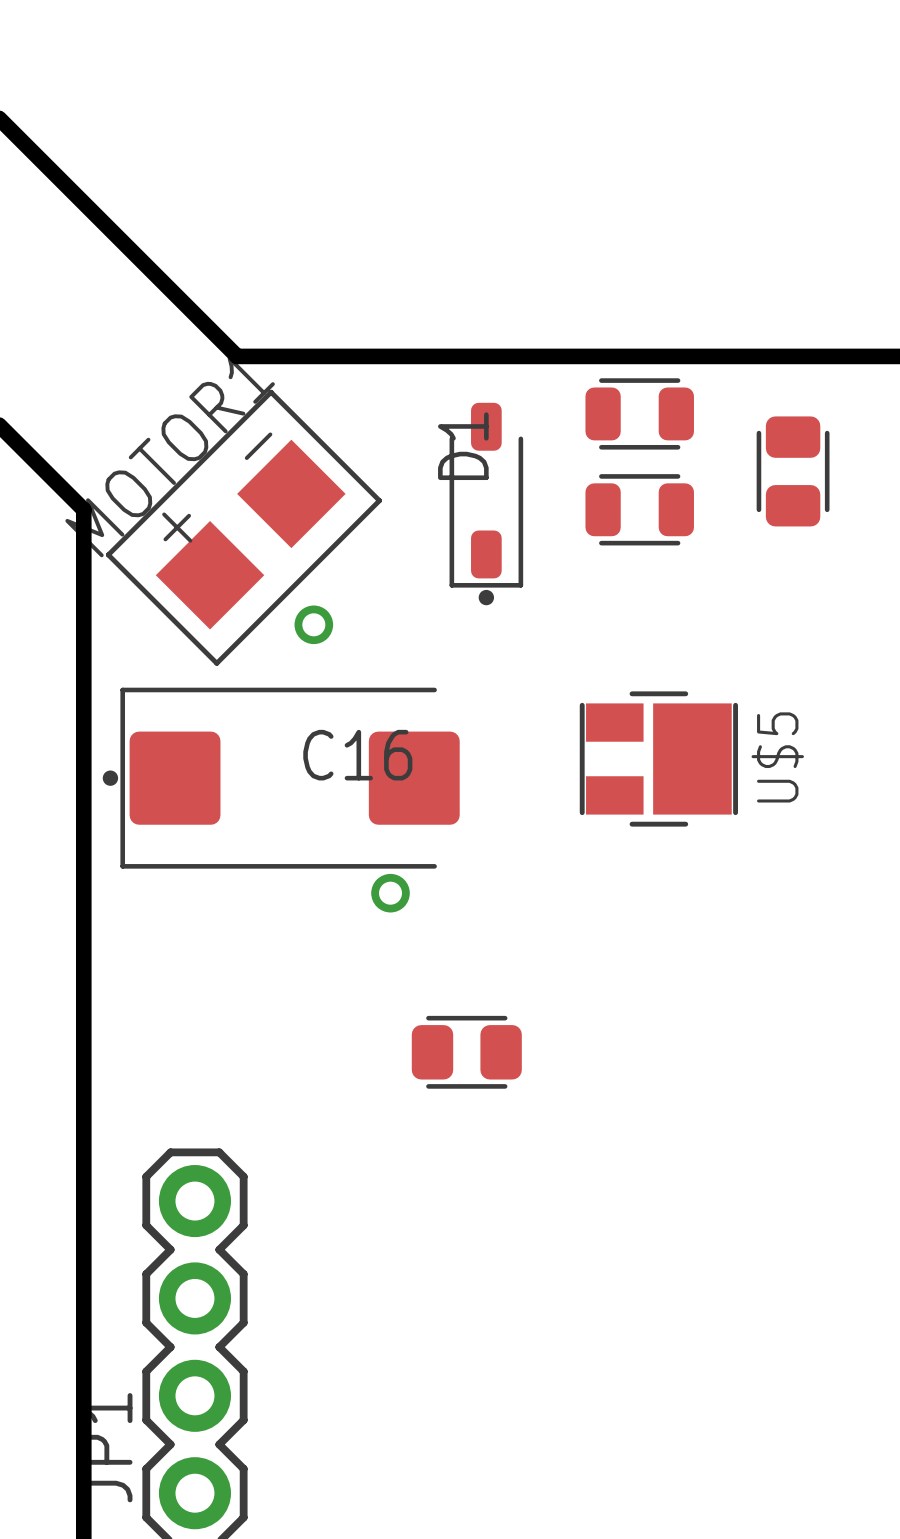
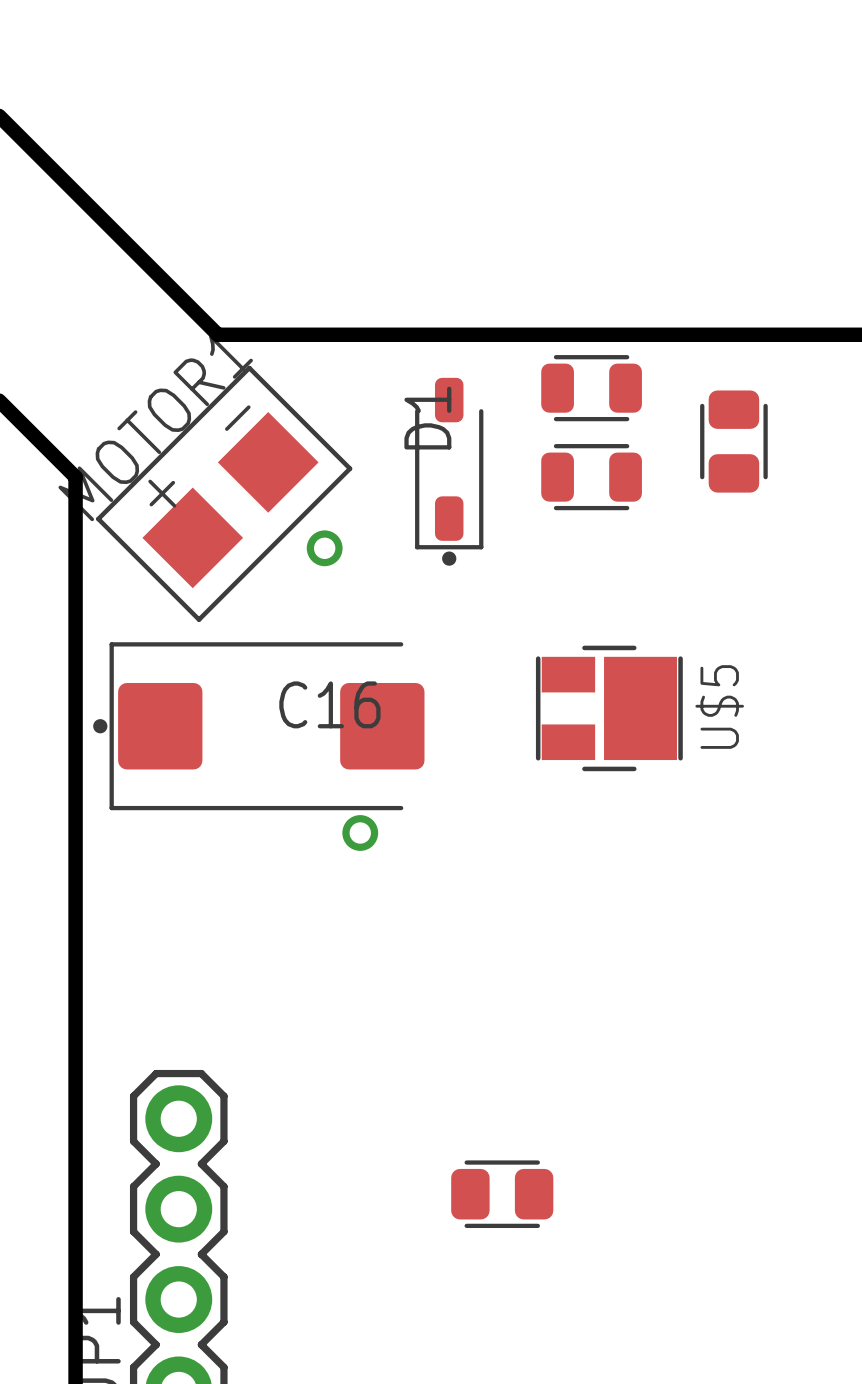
via position: (313, 624) -> (324, 548)
part position: (466, 1052) -> (502, 1194)

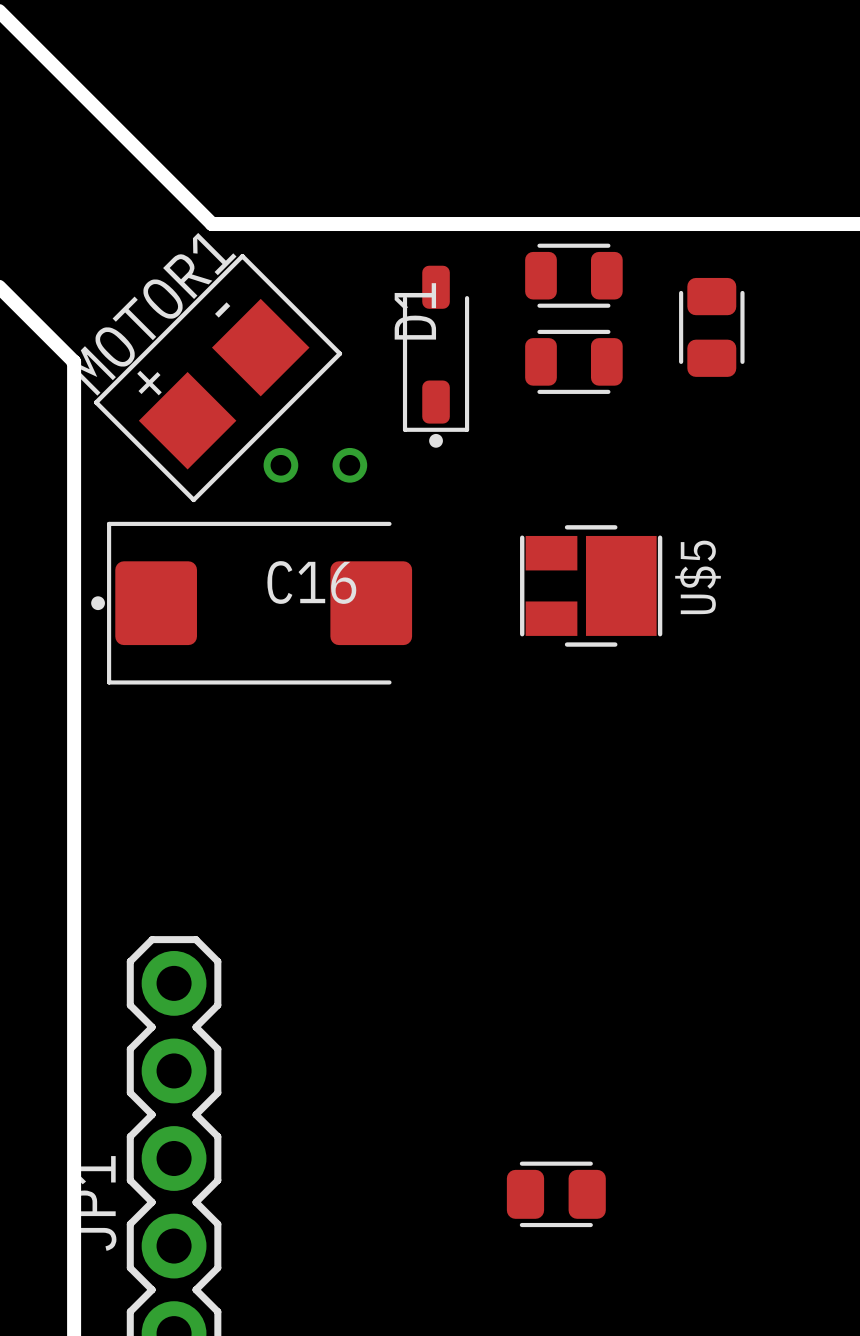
via: (324, 548) -> none
via: none -> (280, 465)
via: none -> (349, 465)
via: (360, 832) -> none
part position: (502, 1194) -> (556, 1194)

